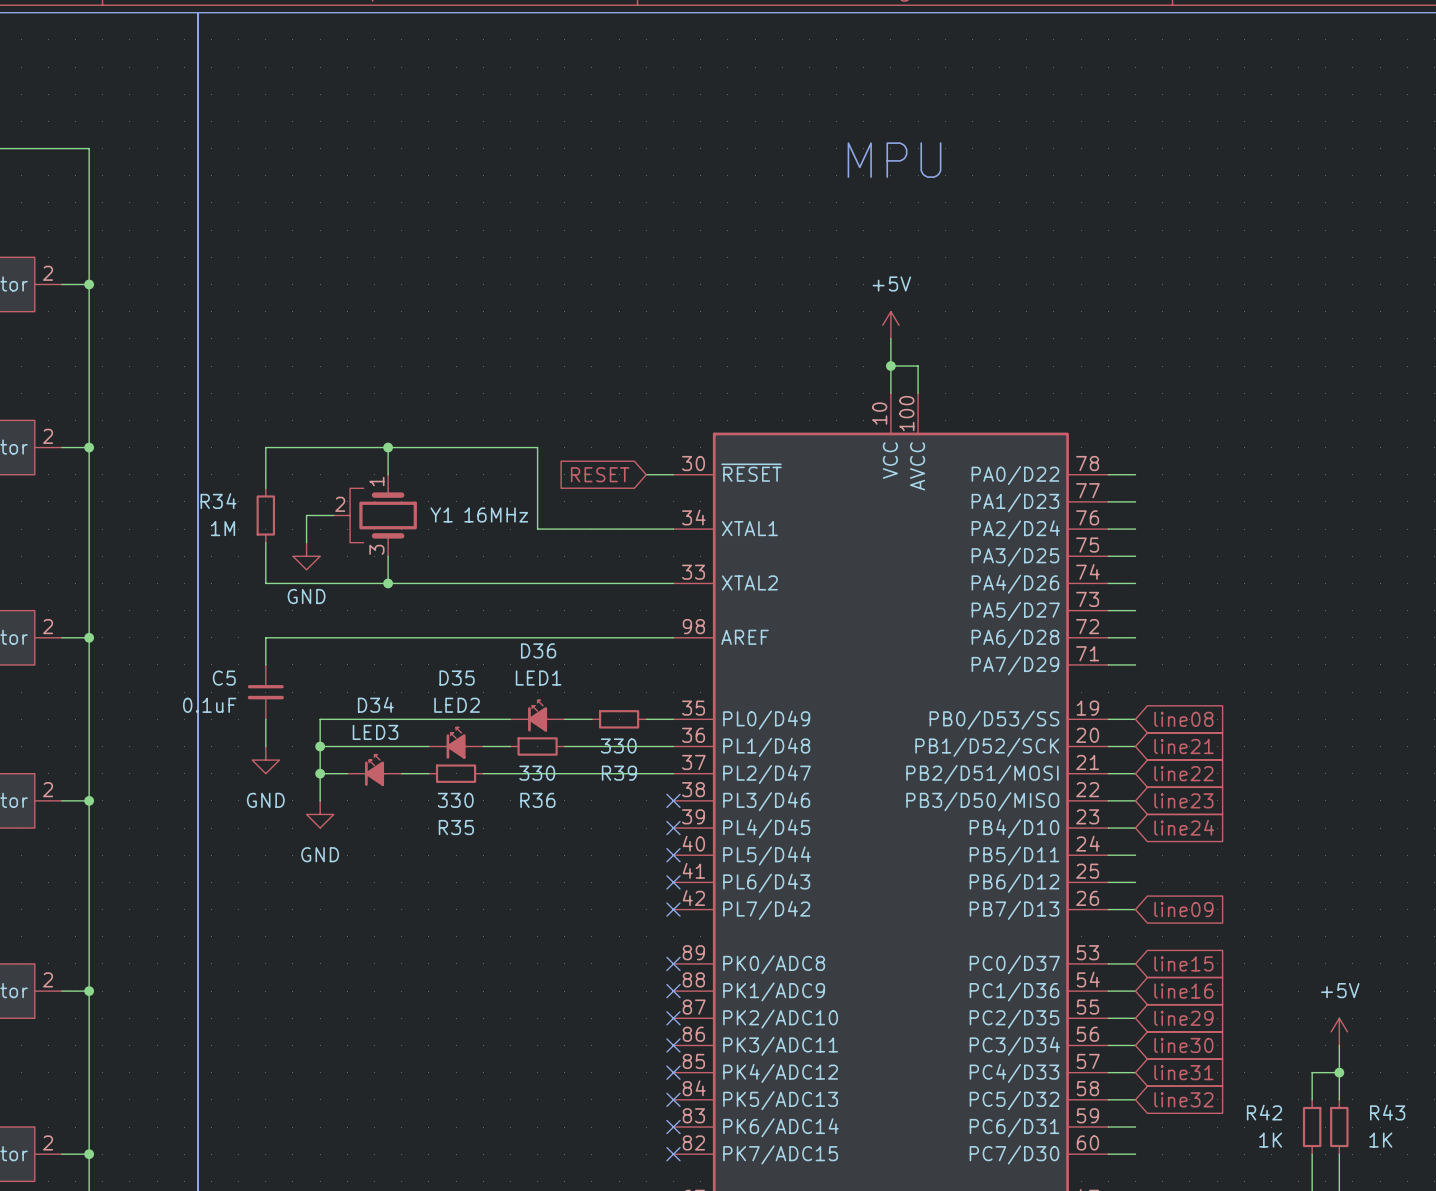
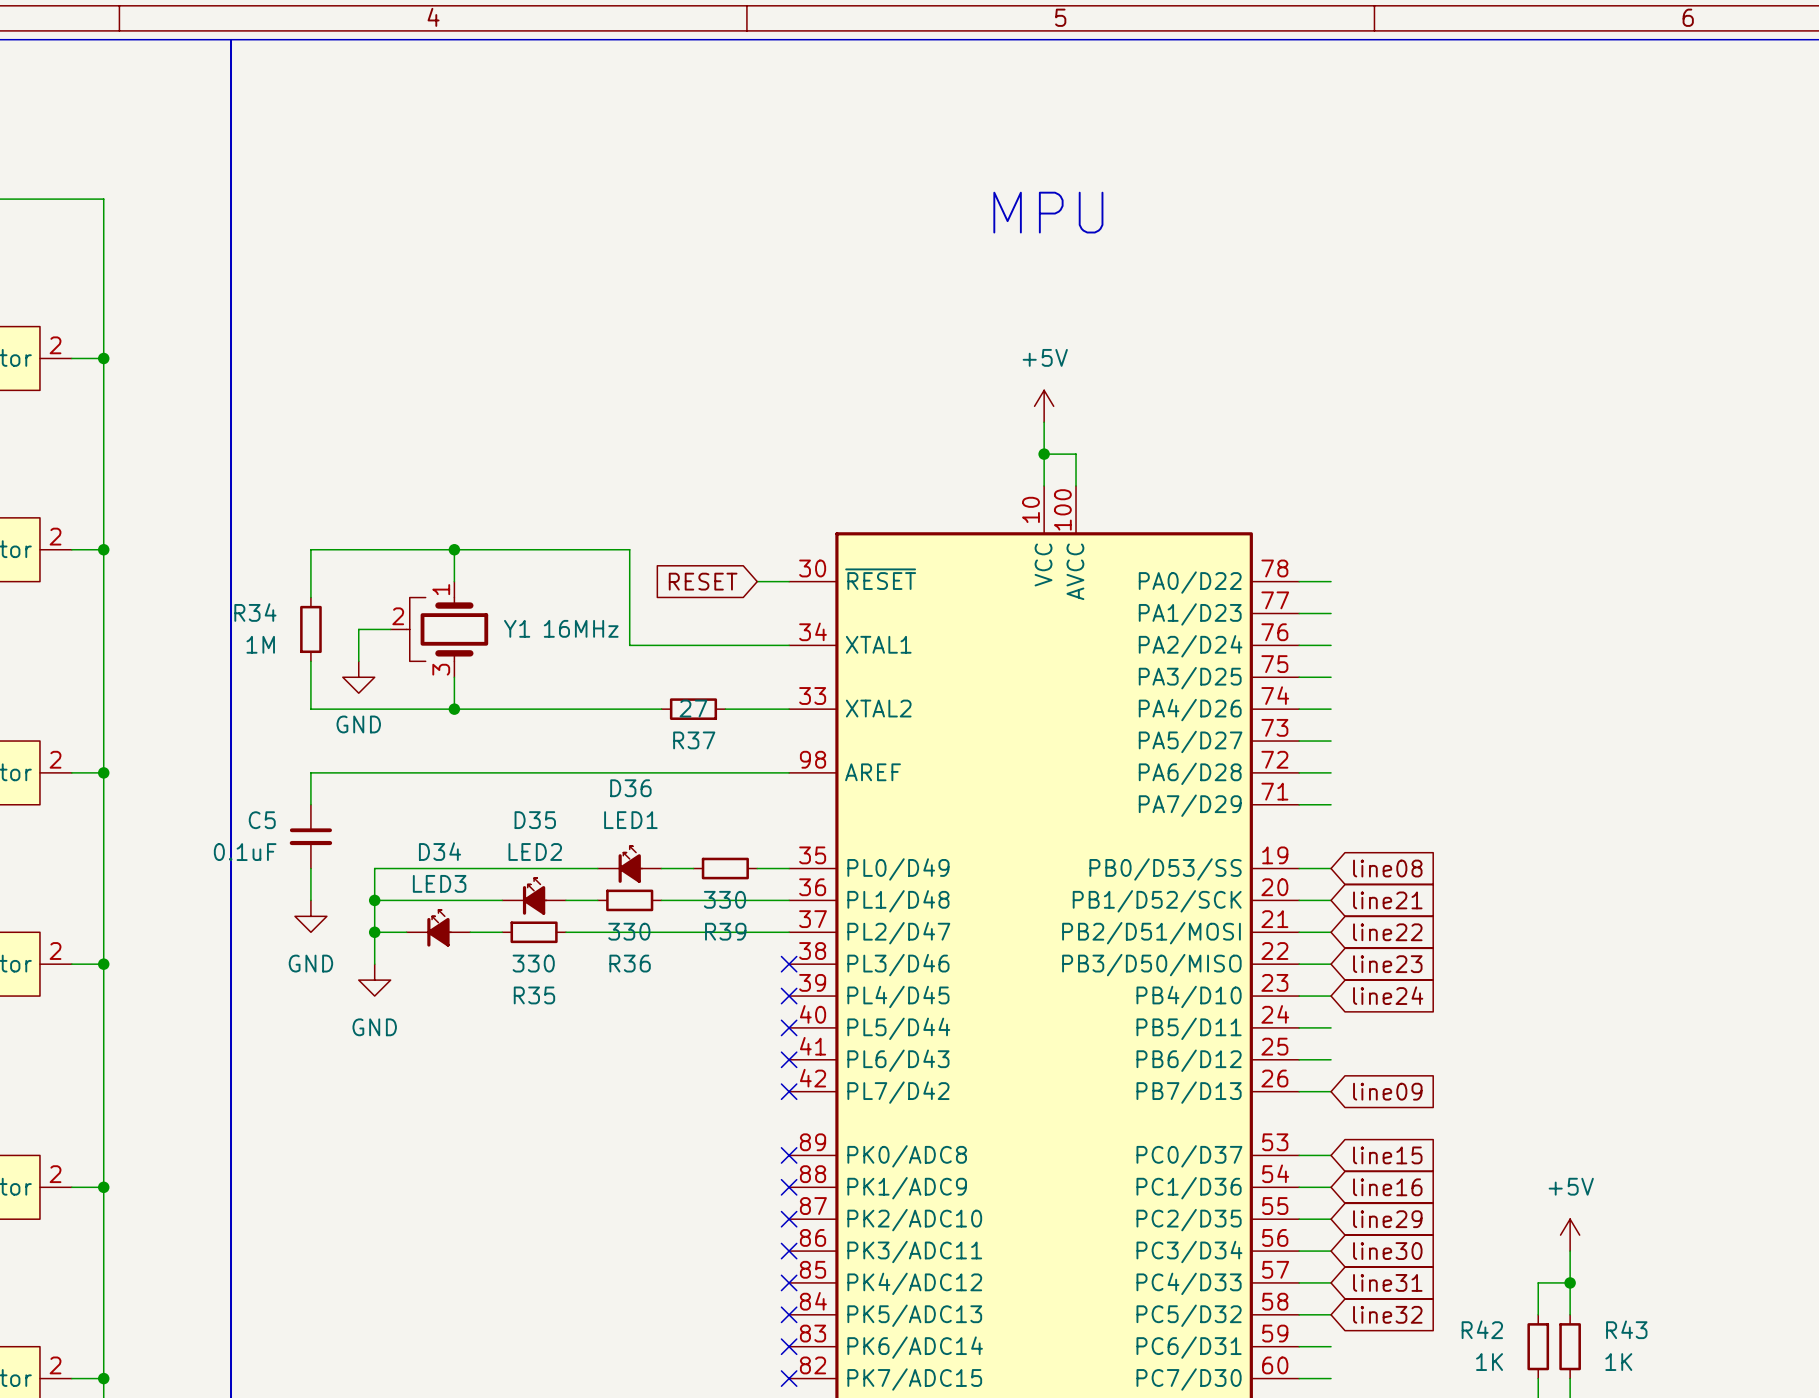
wire: (564, 583) (619, 583) -> none
R37: none -> 27 (693, 709)

